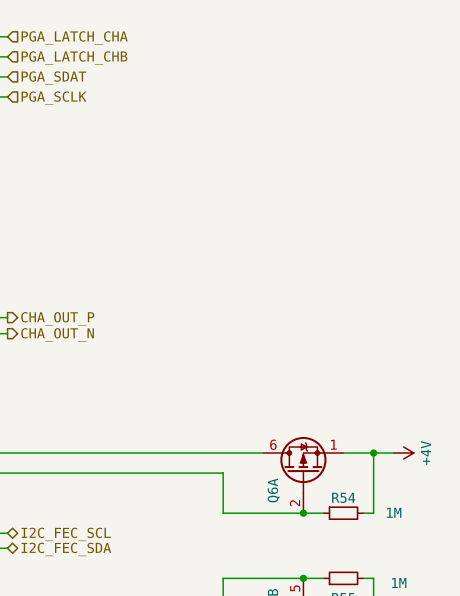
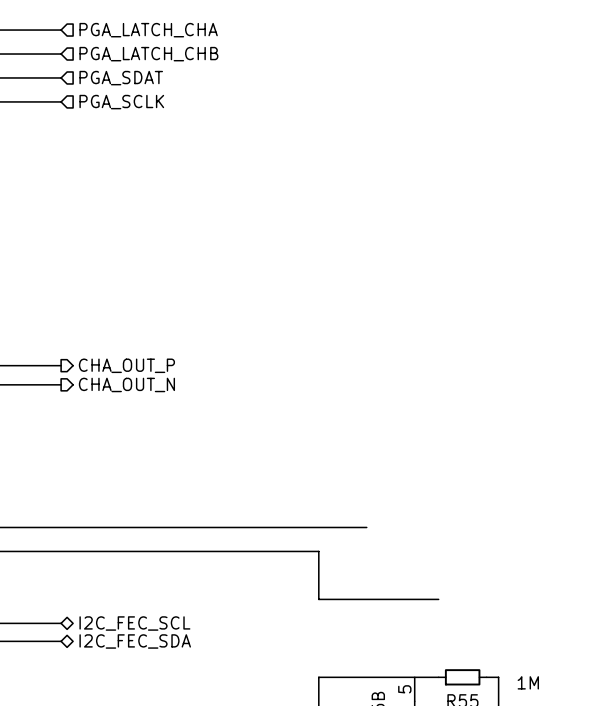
wire: (343, 453) (393, 453) -> none
wire: (373, 453) (373, 513) (363, 513) -> none
junction: (373, 453) -> none
power symbol: +4V (403, 453) -> none
Q6A: (303, 475) -> none
junction: (303, 513) -> none
R54: 1M (343, 513) -> none
junction: (303, 578) -> none

